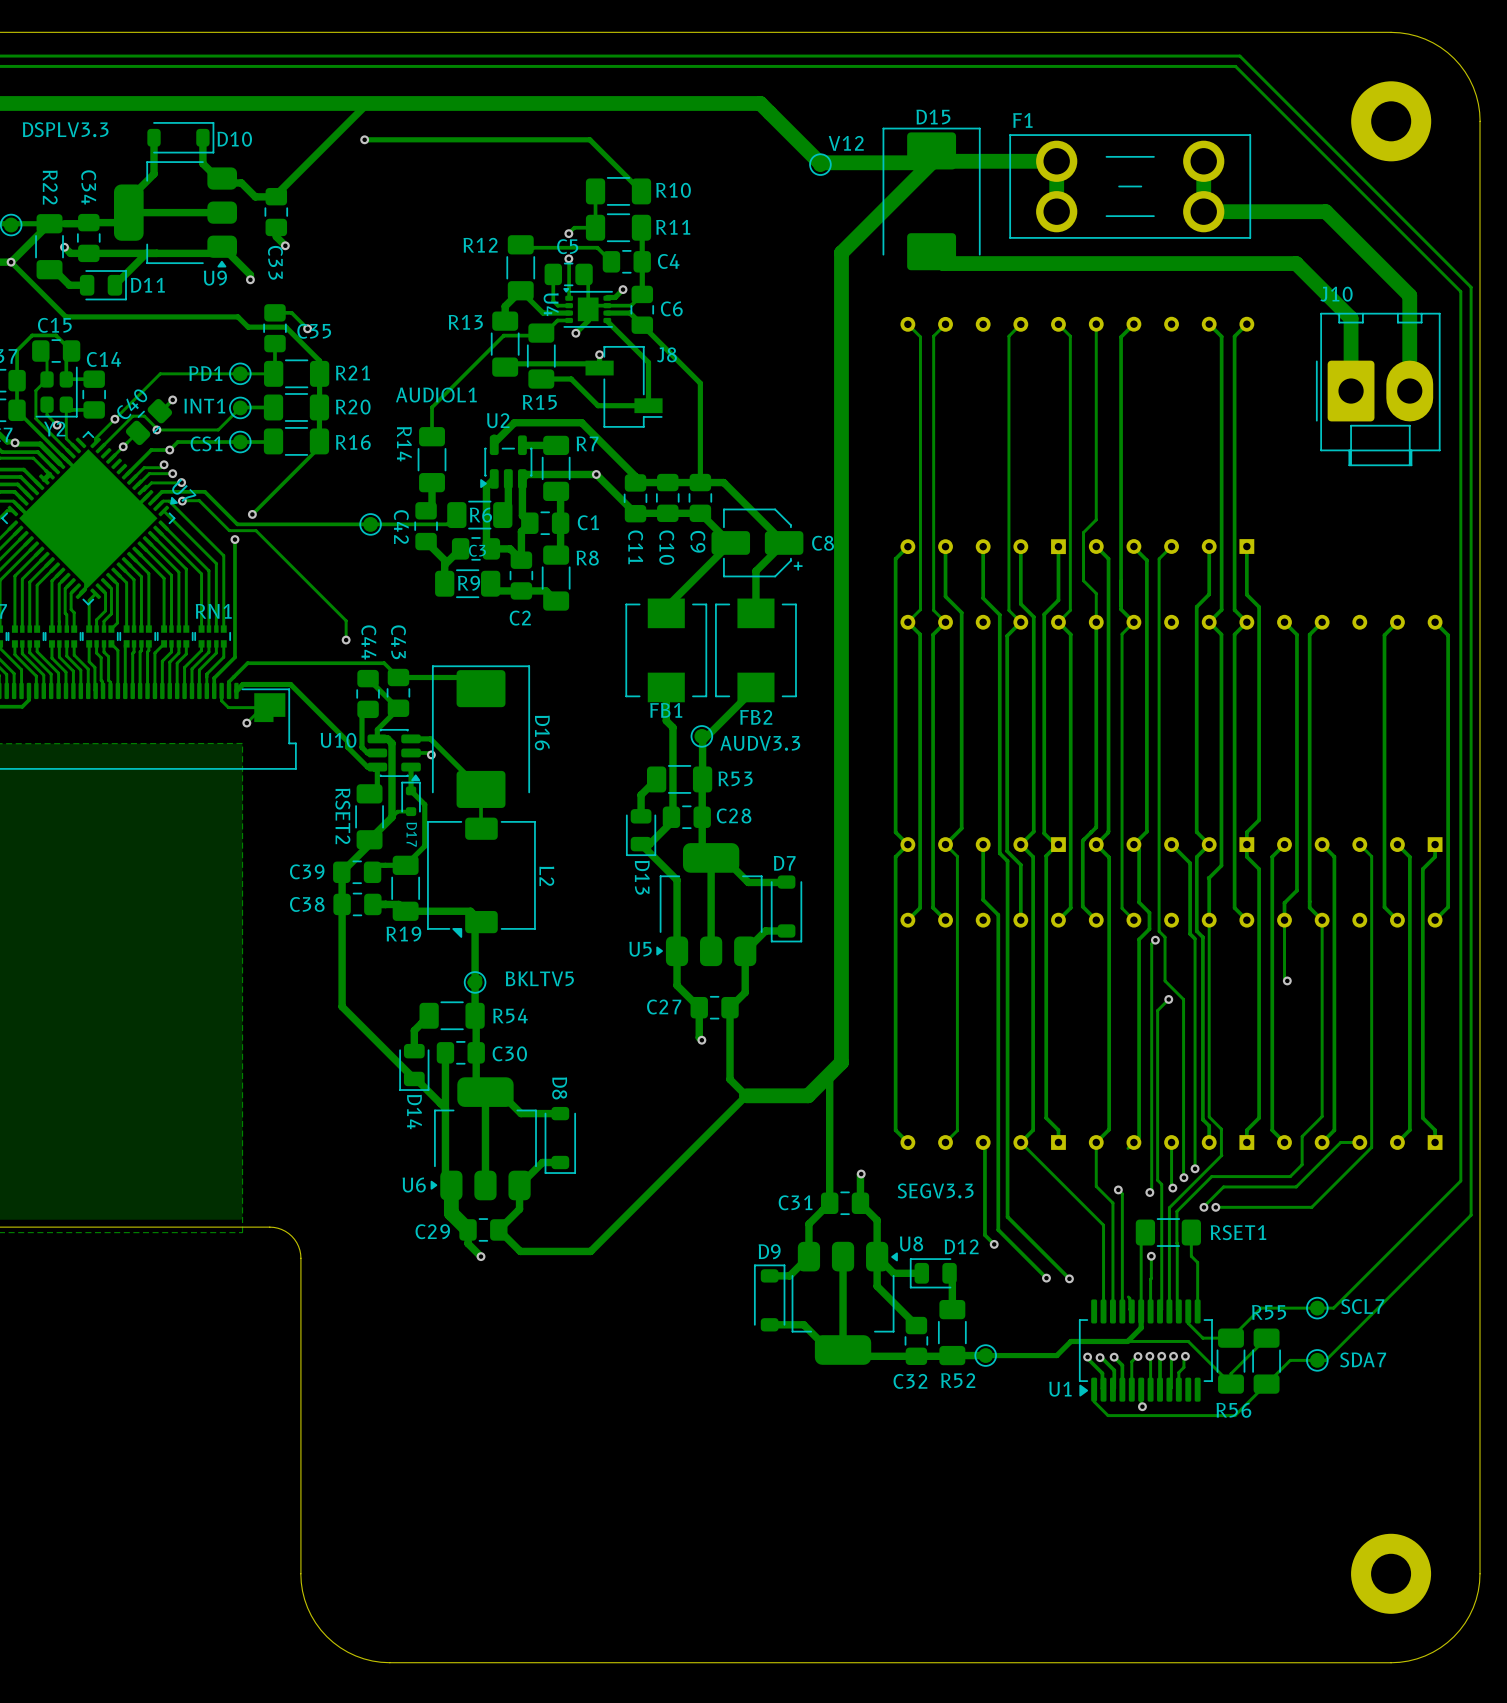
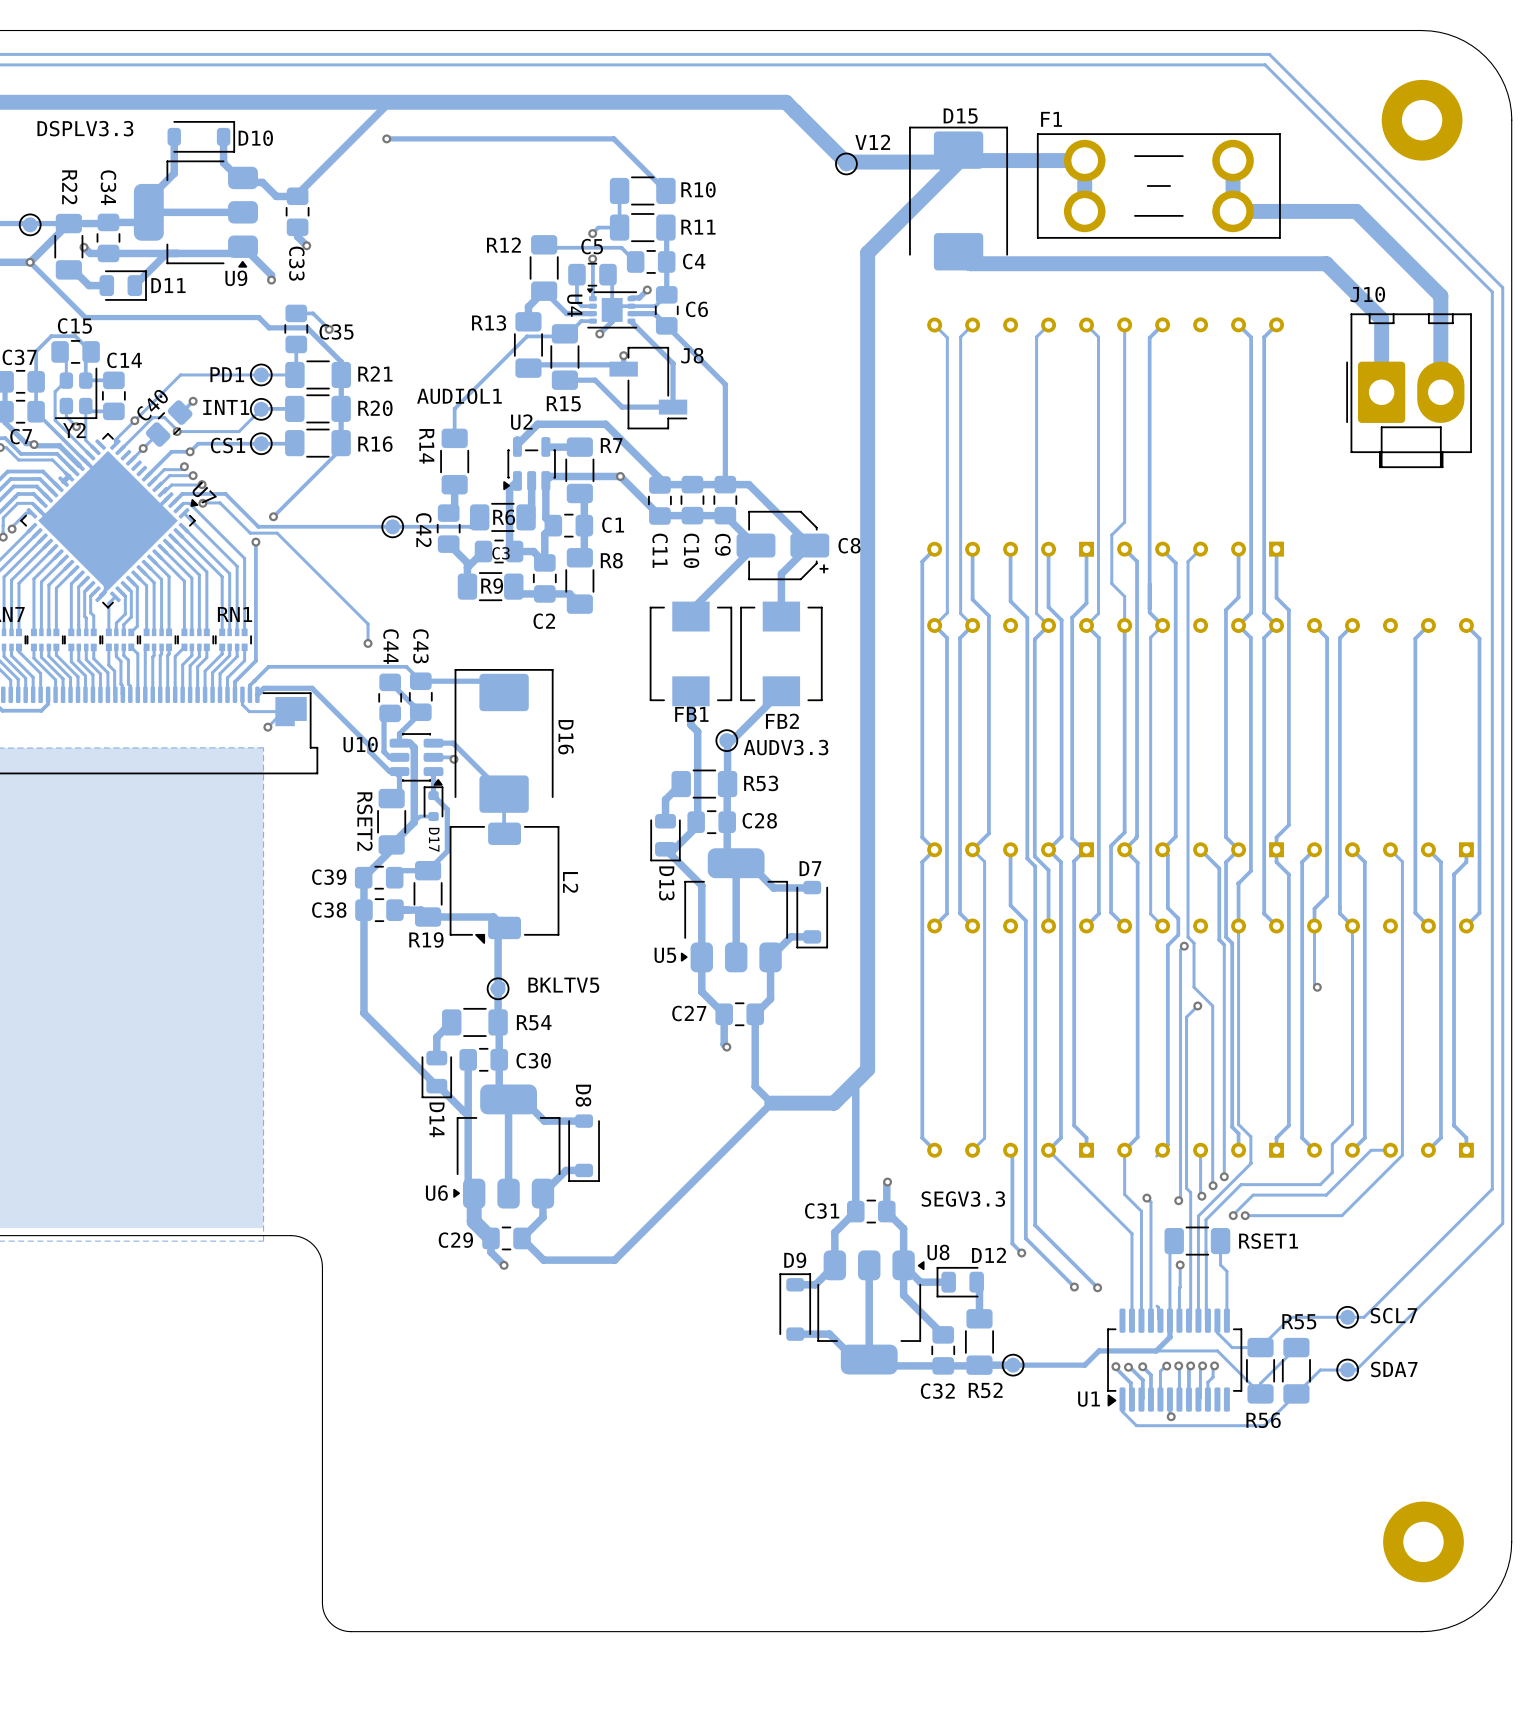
board edge: (1480, 1530) (1478, 1591) (1473, 1607) (1465, 1623) (1453, 1636) (1432, 1652) (1416, 1658) (1391, 1662) (381, 1662) (363, 1658) (347, 1652) (326, 1636) (315, 1623) (307, 1607) (302, 1591) (300, 1573) -> (1511, 1541) (1509, 1559) (1504, 1576) (1496, 1591) (1485, 1605) (1471, 1616) (1456, 1624) (1439, 1629) (1422, 1631) (350, 1631) (335, 1627) (326, 1618) (322, 1606) (322, 1585)
part position: (1391, 1573) -> (1423, 1541)

